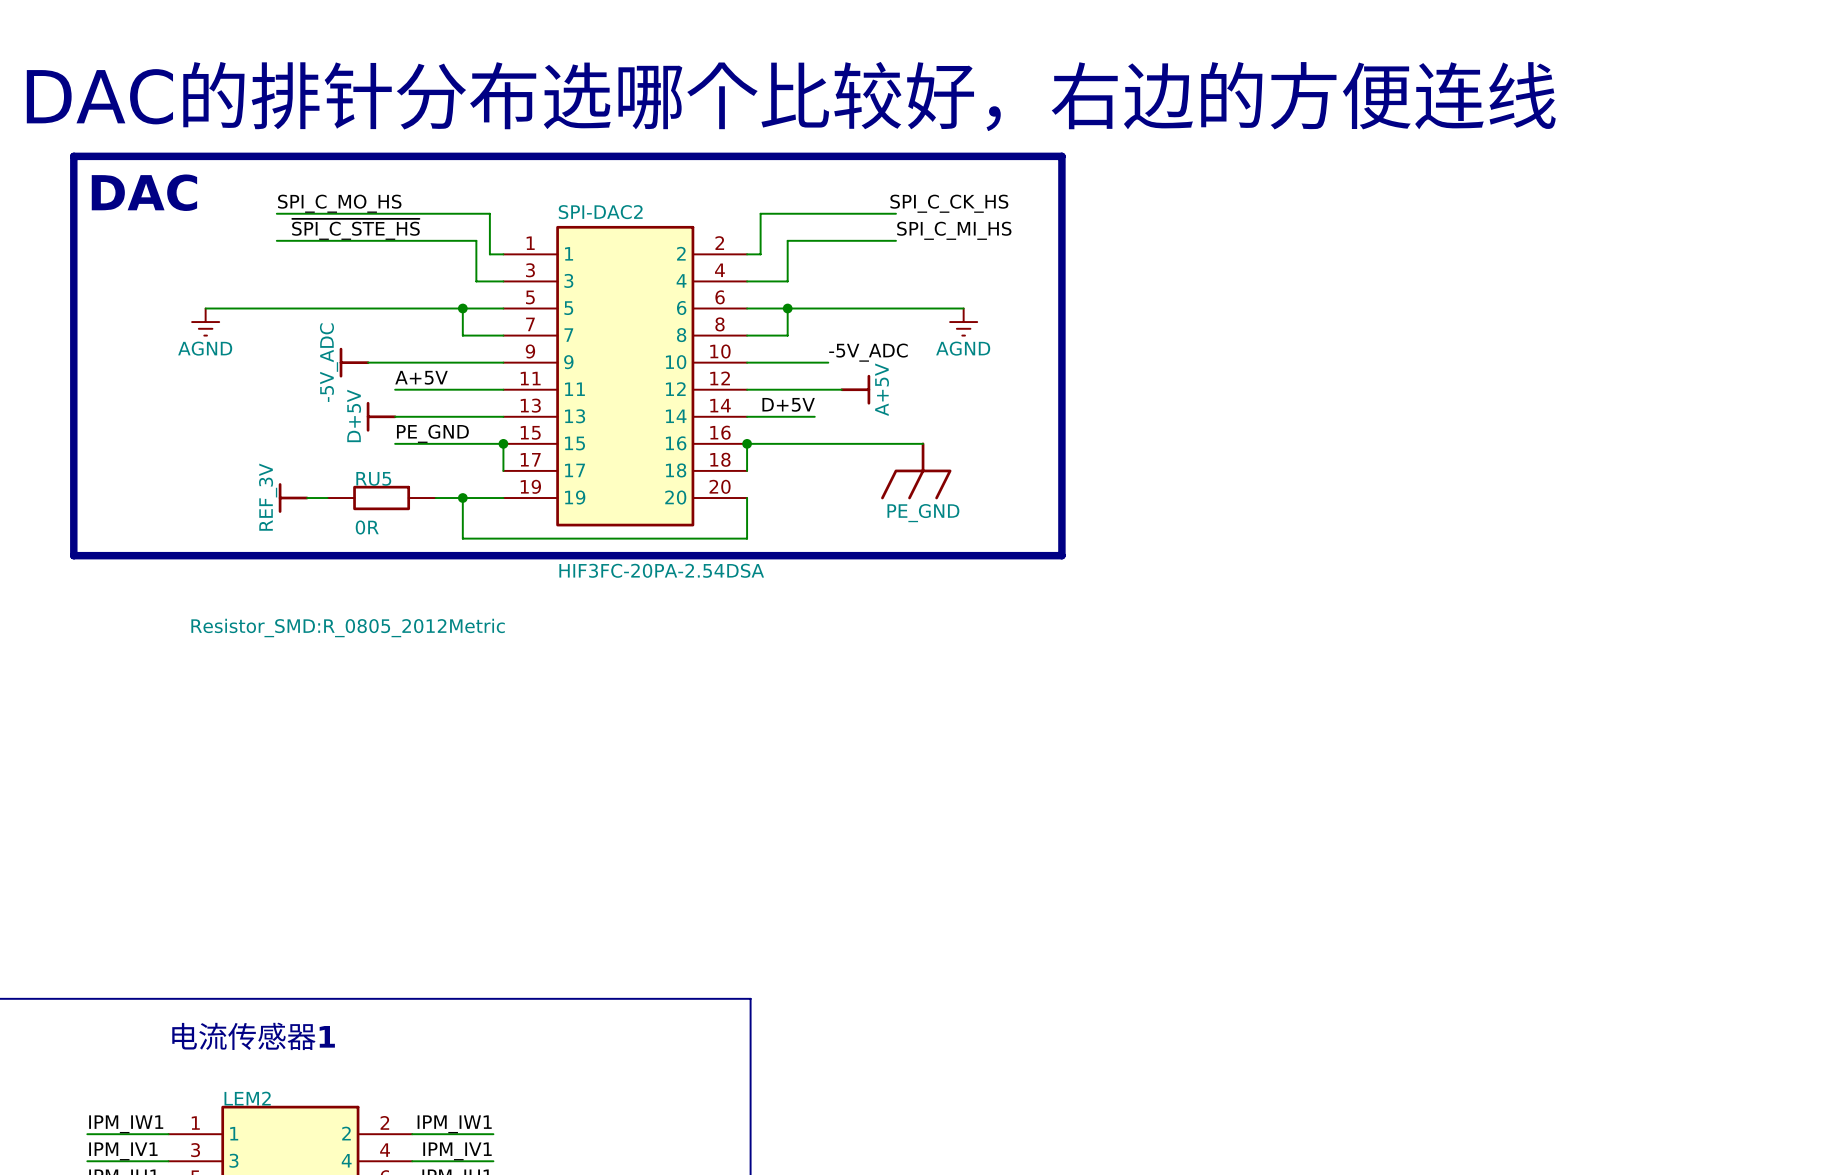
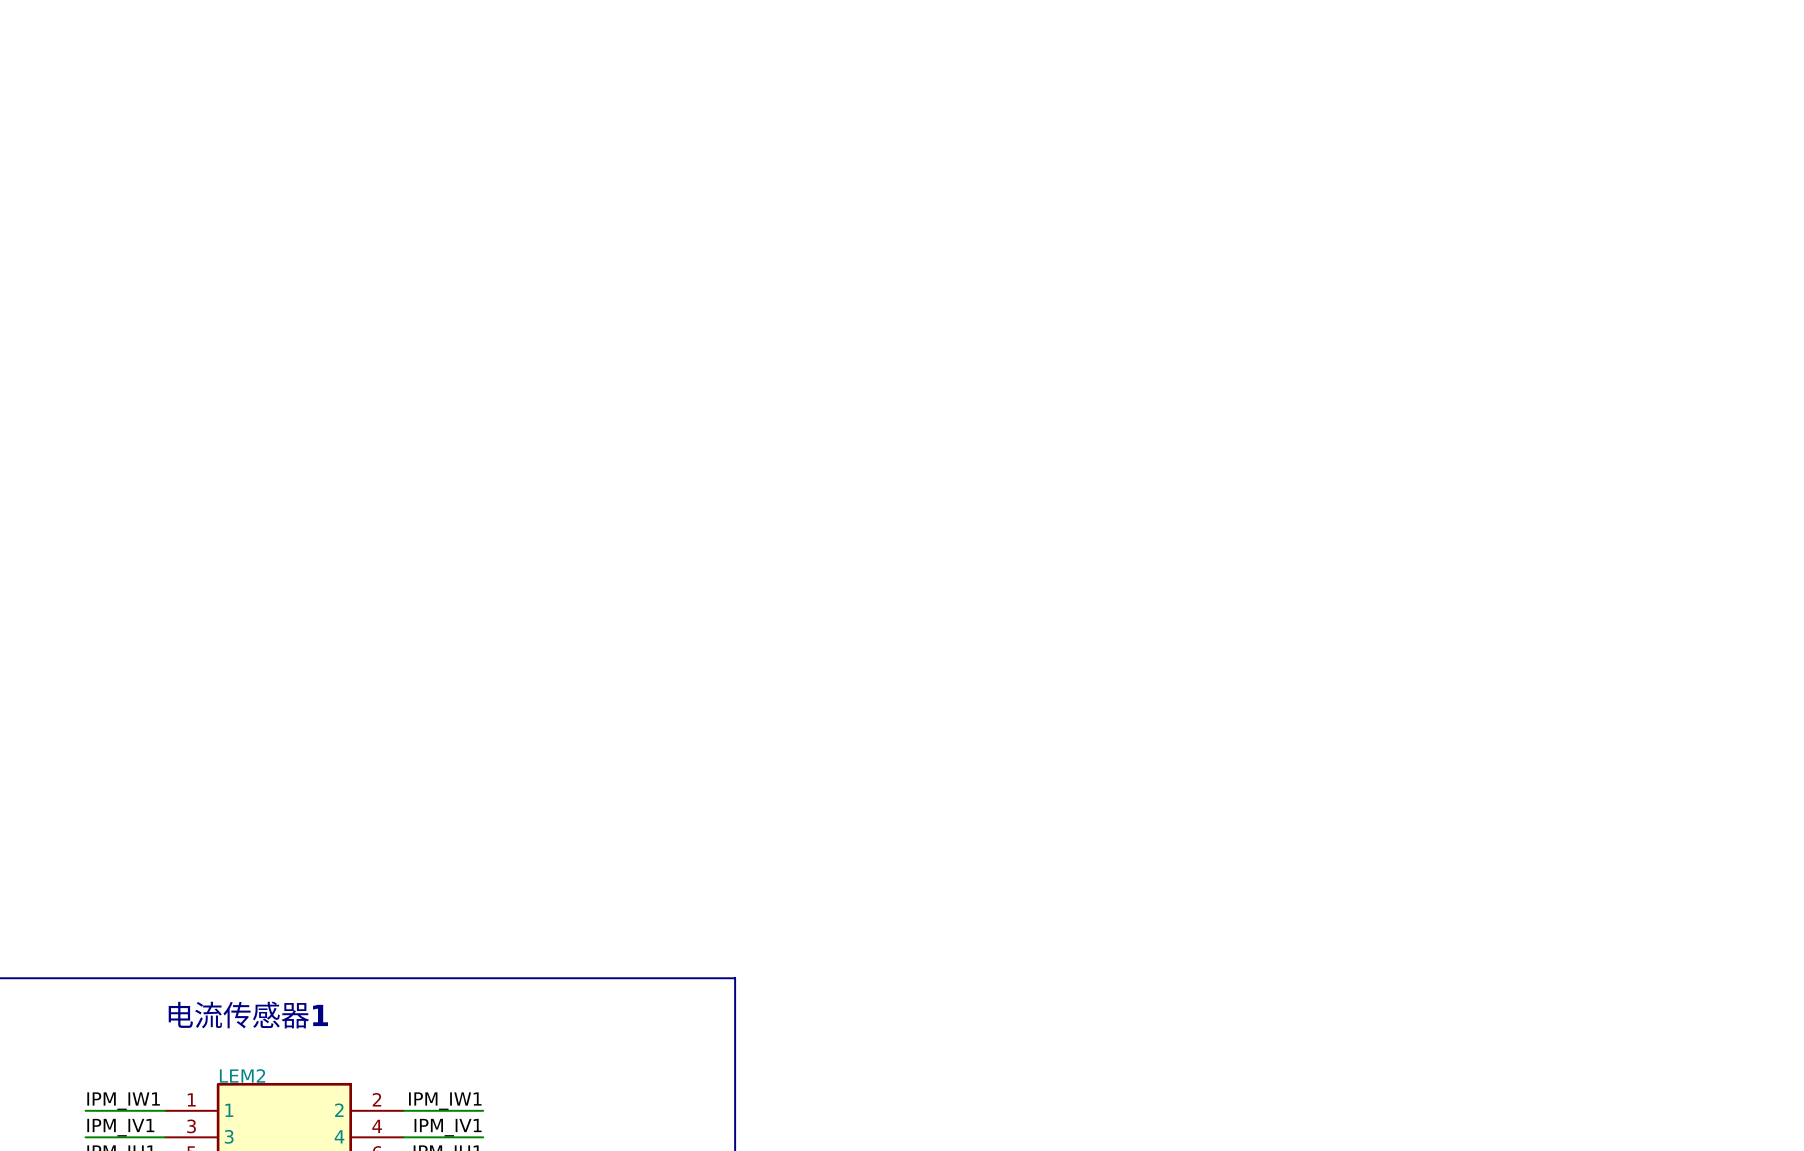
text: DAC的排针分布选哪个比较好，右边的方便连线 (791, 96) -> none
line: (73, 156) (1061, 156) (1061, 555) (73, 555) (73, 156) -> none
text: DAC (144, 192) -> none
label: SPI_C_MO_HS (339, 203) -> none
label: SPI_C_CK_HS (949, 203) -> none
wire: (276, 213) (489, 213) (489, 254) (503, 254) -> none
wire: (895, 213) (760, 213) (760, 254) (747, 254) -> none
label: ~{SPI_C_STE_HS} (355, 229) -> none
label: SPI_C_MI_HS (954, 230) -> none
wire: (276, 240) (476, 240) (476, 281) (503, 281) -> none
wire: (895, 240) (787, 240) (787, 281) (747, 281) -> none
wire: (205, 308) (503, 308) -> none
wire: (462, 308) (462, 335) (503, 335) -> none
junction: (462, 308) -> none
wire: (747, 308) (963, 308) -> none
wire: (787, 308) (787, 335) (747, 335) -> none
junction: (787, 308) -> none
power symbol: AGND (205, 322) -> none
power symbol: AGND (963, 322) -> none
label: -5V_ADC (868, 352) -> none
power symbol: -5V_ADC (354, 362) -> none
wire: (368, 362) (503, 362) -> none
wire: (747, 362) (828, 362) -> none
SPI-DAC2: HIF3FC-20PA-2.54DSA (625, 376) -> none
label: A+5V (421, 377) -> none
wire: (395, 389) (503, 389) -> none
wire: (747, 389) (841, 389) -> none
power symbol: A+5V (855, 389) -> none
label: D+5V (788, 404) -> none
power symbol: D+5V (381, 416) -> none
wire: (395, 416) (503, 416) -> none
wire: (747, 416) (814, 416) -> none
label: PE_GND (432, 433) -> none
wire: (395, 443) (503, 443) (503, 470) -> none
junction: (503, 443) -> none
junction: (747, 443) -> none
wire: (923, 443) (747, 443) (747, 470) -> none
power symbol: PE_GND (916, 470) -> none
power symbol: REF_3V (293, 498) -> none
wire: (307, 498) (327, 498) -> none
RU5: 0R (381, 498) -> none
wire: (435, 498) (503, 498) -> none
wire: (462, 498) (462, 538) (747, 538) (747, 498) -> none
junction: (462, 498) -> none

